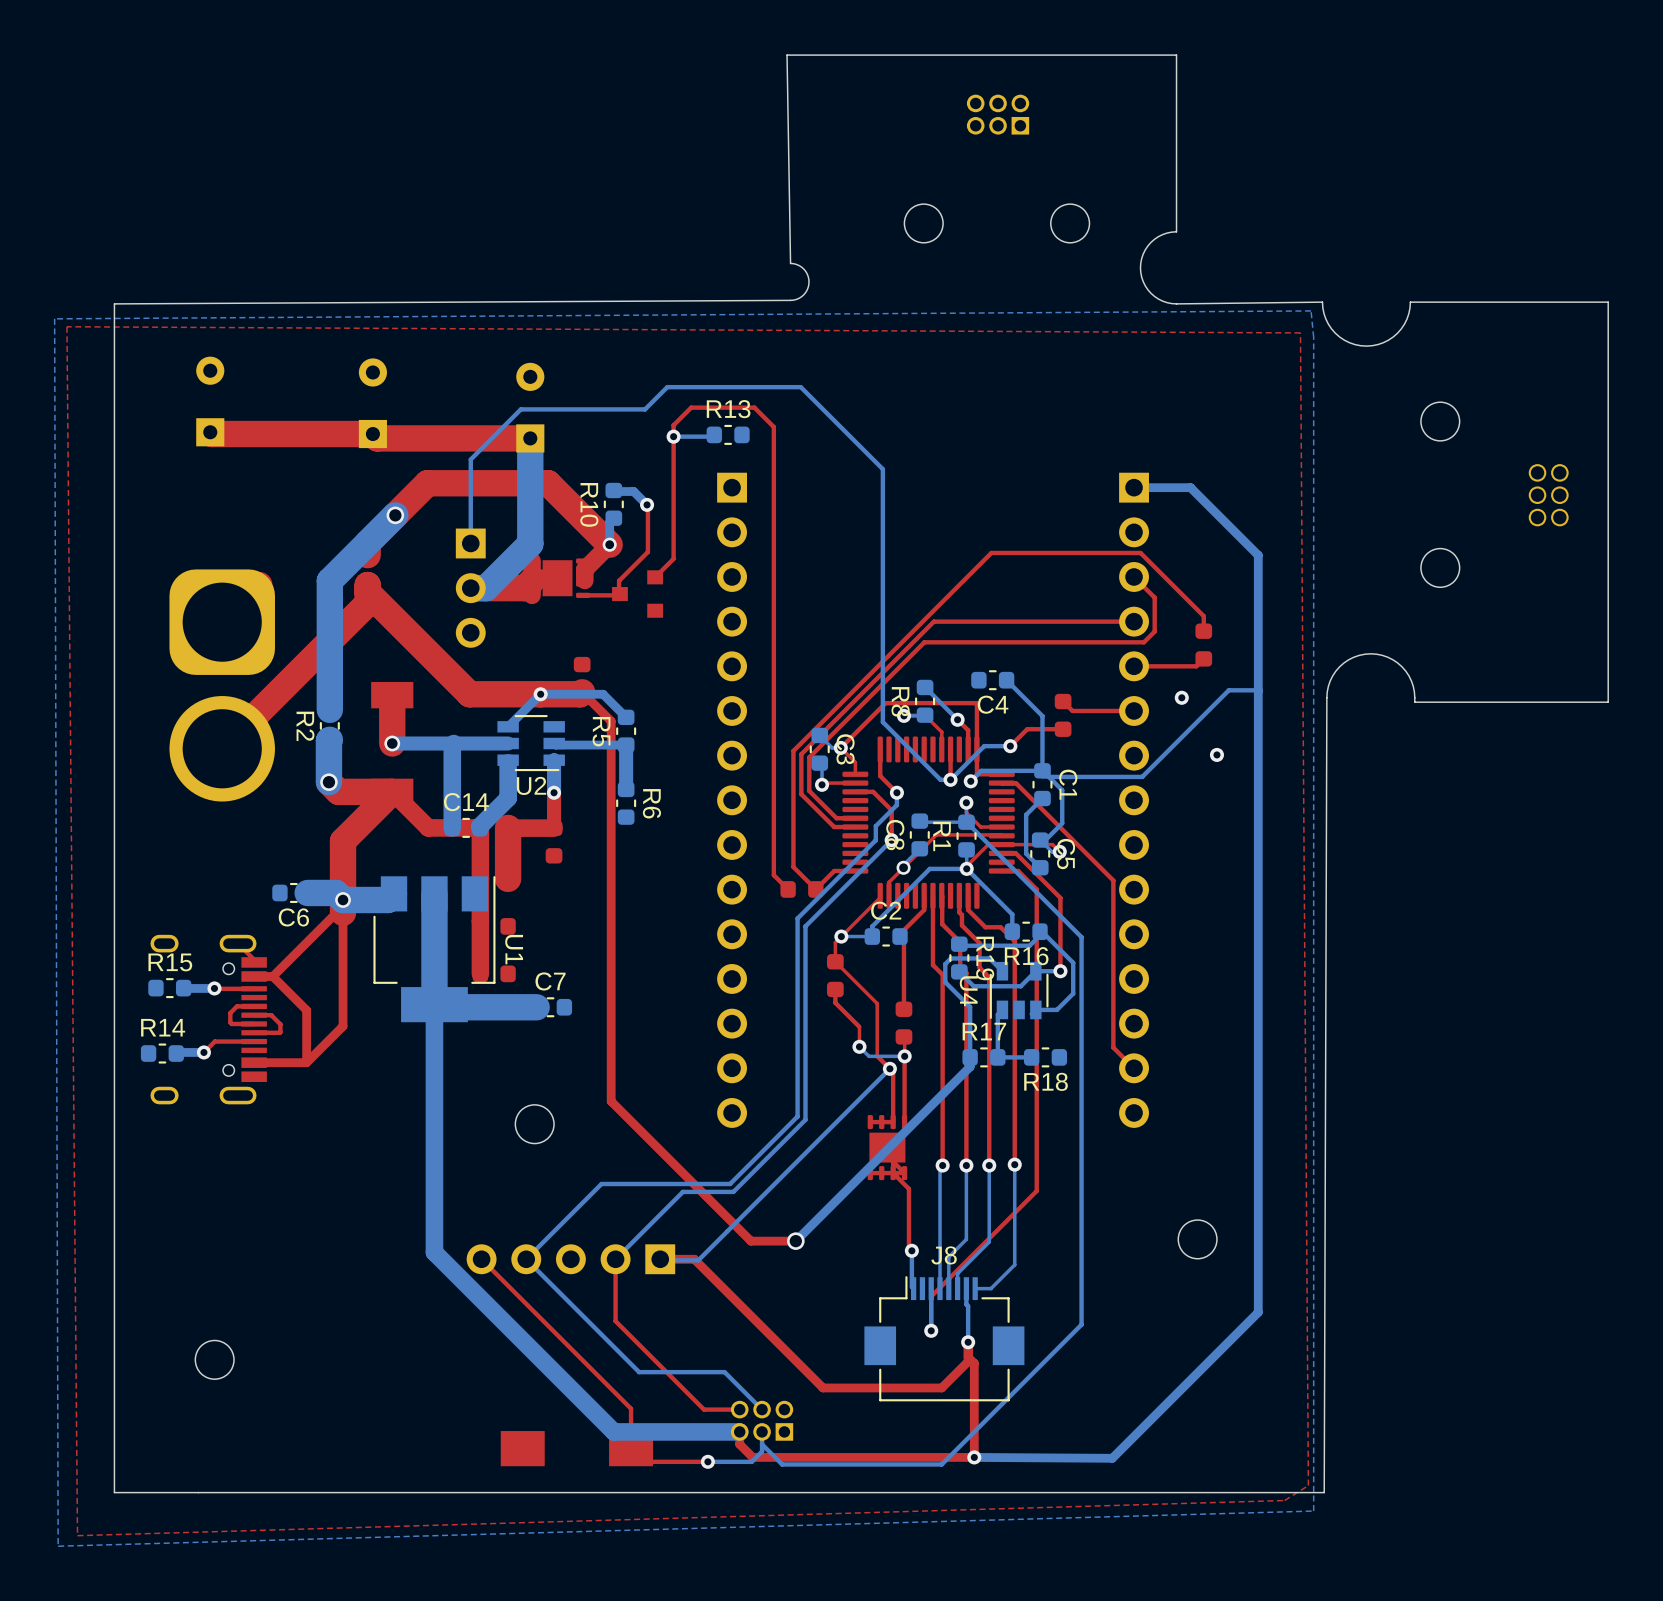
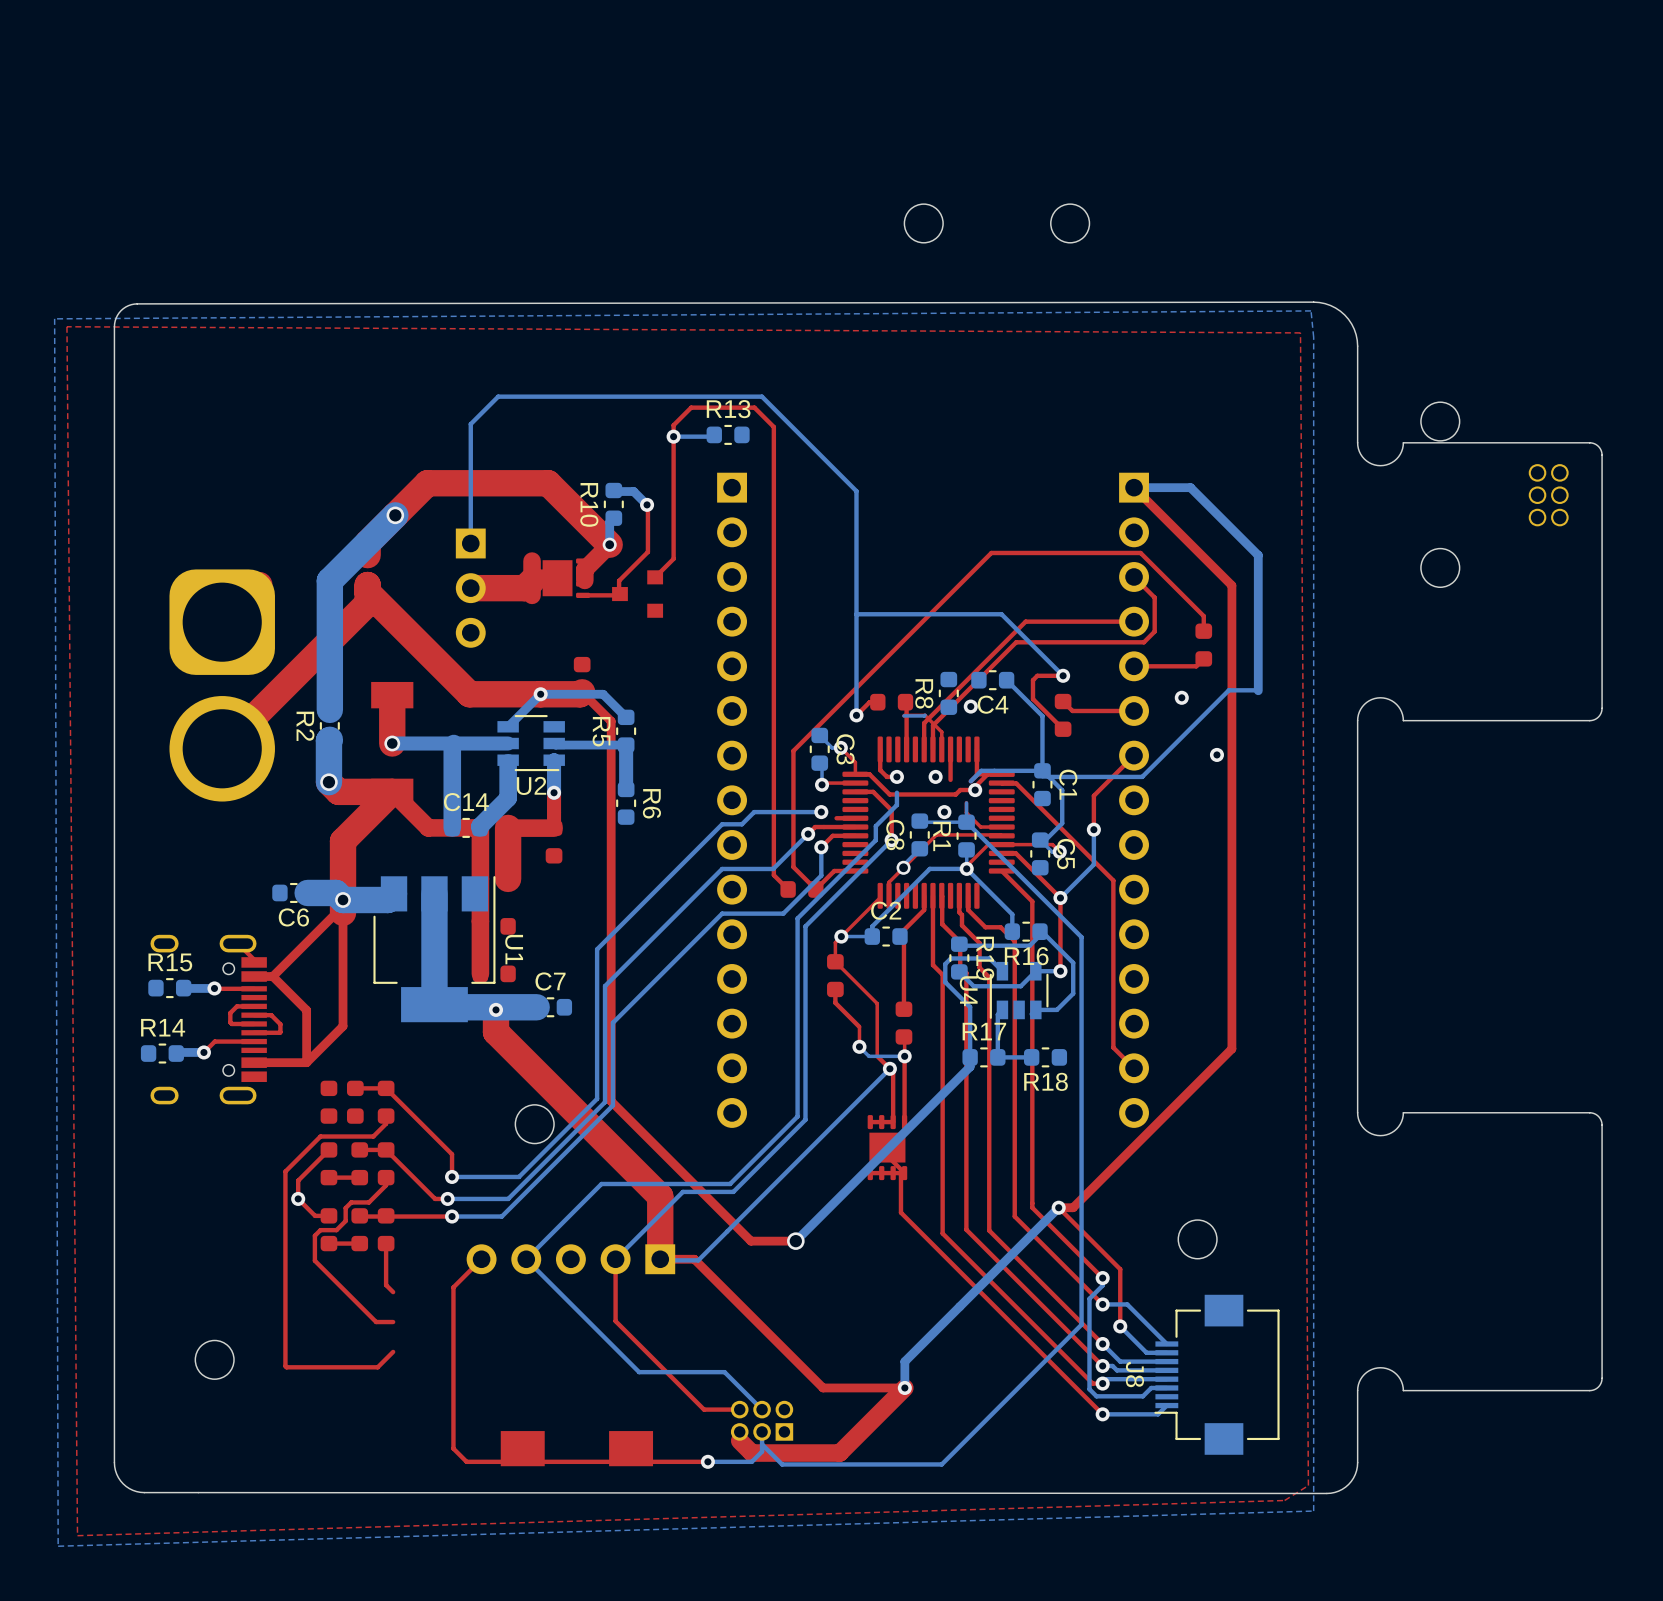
part: (998, 114) -> none
board edge: (114, 326) (114, 303) (797, 298) (805, 293) (809, 281) (803, 268) (790, 263) (787, 55) (1176, 55) (1176, 231) (1162, 234) (1151, 242) (1143, 254) (1140, 267) (1143, 281) (1147, 289) (1158, 299) (1167, 302) (1322, 302) (1325, 318) (1335, 333) (1349, 342) (1366, 346) (1383, 342) (1397, 333) (1407, 318) (1410, 302) (1608, 302) (1608, 702) (1414, 702) (1411, 680) (1401, 666) (1387, 657) (1370, 653) (1354, 657) (1344, 662) (1332, 675) (1328, 686) (1324, 1492) (198, 1492) -> (114, 326) (116, 318) (121, 310) (128, 305) (137, 303) (1319, 302) (1340, 311) (1351, 324) (1356, 334) (1357, 445) (1362, 456) (1369, 462) (1380, 465) (1391, 462) (1400, 454) (1403, 442) (1589, 442) (1597, 445) (1601, 453) (1602, 708) (1598, 717) (1589, 720) (1403, 720) (1401, 711) (1396, 704) (1389, 699) (1380, 697) (1371, 699) (1364, 704) (1359, 711) (1357, 720) (1357, 1112) (1359, 1121) (1366, 1130) (1380, 1135) (1389, 1133) (1396, 1128) (1401, 1121) (1403, 1112) (1589, 1112) (1598, 1116) (1602, 1125) (1602, 1378) (1597, 1388) (1589, 1390) (1403, 1390) (1400, 1379) (1394, 1372) (1383, 1367) (1371, 1369) (1362, 1376) (1357, 1387) (1356, 1470) (1348, 1484) (1342, 1489) (1330, 1493) (198, 1492)
part: (210, 401) -> none
part: (372, 403) -> none
part: (530, 407) -> none
top track: (210, 432) (212, 434) (372, 434) (377, 438) (530, 438) -> none
bottom track: (530, 438) (530, 543) (486, 588) (470, 588) -> none
bottom track: (470, 459) (520, 409) (645, 409) (667, 387) (800, 387) (882, 469) (882, 722) (940, 779) (950, 779) (984, 746) (1010, 746) -> (470, 459) (470, 424) (498, 396) (761, 396) (856, 491) (856, 715)
top track: none -> (1134, 487) (1231, 585) (1231, 1048) (1073, 1207) (1058, 1207) (1120, 1269) (1120, 1326)
bottom track: none -> (856, 614) (1001, 614) (1063, 675)
top track: (1025, 621) (933, 621) (801, 754) (801, 794) (834, 827) -> (1025, 621) (924, 723) (924, 749)
top track: (1016, 642) (924, 642) (809, 757) (809, 790) (836, 818) -> (1016, 642) (932, 725) (932, 749)
via: none -> (1063, 675)
bottom track: (925, 687) (957, 719) -> none
bottom track: (1258, 690) (1258, 1312) (1112, 1458) (974, 1458) -> none
R8 position: (925, 701) -> (948, 693)
top track: none -> (877, 702) (869, 702) (856, 715)
part: none -> (891, 702)
top track: none -> (905, 702) (906, 749)
via: none -> (856, 715)
via: (903, 715) -> none
top track: (957, 719) (968, 730) (968, 749) -> none
via position: (957, 719) -> (970, 706)
top track: (1063, 729) (1027, 729) (1010, 746) -> (1063, 729) (1032, 699) (1032, 680) (1037, 675) (1063, 675)
via: (1010, 746) -> none
top track: (840, 747) (885, 703) (976, 703) (976, 749) -> none
top track: none -> (1134, 755) (1093, 795) (1093, 829)
top track: (880, 770) (880, 776) (896, 792) -> (880, 770) (886, 776) (896, 776)
top track: none -> (855, 774) (869, 774) (889, 794) (955, 794) (960, 790) (972, 790)
top track: none -> (987, 774) (975, 786) (975, 790) (972, 790)
via: none -> (935, 776)
via: (950, 779) -> none
via: (970, 781) -> none
via: none -> (975, 790)
via position: (896, 792) -> (896, 776)
bottom track: (1042, 798) (1026, 814) (1026, 853) (1040, 867) -> none
via: (966, 802) -> none
bottom track: none -> (821, 812) (754, 812) (741, 824) (722, 824) (597, 949) (597, 1098) (519, 1176) (447, 1176)
via: none -> (821, 812)
via: none -> (944, 812)
top track: none -> (834, 827) (815, 827) (808, 834)
bottom track: none -> (1093, 829) (1093, 864) (1060, 897)
via: none -> (1093, 829)
bottom track: none -> (808, 834) (773, 868) (722, 868) (605, 986) (605, 1102) (508, 1198) (447, 1198)
via: none -> (808, 834)
top track: none -> (855, 835) (832, 835) (821, 847)
bottom track: none -> (821, 847) (821, 875) (783, 913) (722, 913) (612, 1022) (612, 1105) (501, 1216) (452, 1216)
via: none -> (821, 847)
top track: (1001, 870) (1018, 870) (1036, 889) (1036, 1191) (931, 1296) (931, 1330) -> (1001, 870) (1032, 901) (1032, 1207) (1102, 1278)
via: none -> (1060, 897)
bottom track: (434, 1004) (434, 1252) (613, 1431) (739, 1431) -> none
top track: none -> (496, 1009) (496, 1032) (660, 1196) (660, 1259)
via: none -> (496, 1009)
top track: none -> (355, 1088) (386, 1088) (452, 1154) (452, 1176)
part: none -> (328, 1102)
part: none -> (355, 1102)
part: none -> (386, 1102)
top track: none -> (386, 1116) (386, 1123) (373, 1136) (320, 1136) (285, 1171) (285, 1366) (377, 1367) (393, 1351)
top track: none -> (328, 1149) (298, 1180) (298, 1198) (315, 1215) (328, 1215)
top track: none -> (359, 1149) (386, 1149) (435, 1198) (447, 1198)
top track: (893, 1153) (893, 1173) (908, 1188) (908, 1247) (911, 1250) -> none
part: none -> (328, 1163)
part: none -> (359, 1163)
part: none -> (386, 1163)
bottom track: (1014, 1164) (1014, 1264) (991, 1288) (975, 1288) -> none
top track: none -> (1014, 1164) (1014, 1216) (1102, 1304)
via: (1014, 1164) -> none
bottom track: (942, 1165) (940, 1168) (940, 1288) -> none
top track: none -> (942, 1165) (942, 1233) (1092, 1383) (1102, 1383)
via: (942, 1165) -> none
bottom track: (966, 1165) (966, 1239) (948, 1256) (948, 1288) -> none
top track: none -> (966, 1165) (966, 1229) (1102, 1365)
via: (966, 1165) -> none
bottom track: (989, 1165) (989, 1242) (957, 1273) (957, 1288) -> none
top track: none -> (989, 1165) (989, 1230) (1102, 1344)
via: (989, 1165) -> none
top track: none -> (900, 1173) (900, 1212) (1102, 1414)
via: none -> (452, 1176)
top track: none -> (359, 1177) (328, 1177)
top track: none -> (386, 1177) (386, 1185) (368, 1202) (351, 1202) (345, 1208) (345, 1221) (336, 1230) (320, 1230) (314, 1235) (314, 1260) (376, 1322) (393, 1322)
via: none -> (298, 1198)
via: none -> (447, 1198)
bottom track: none -> (1058, 1207) (904, 1361) (904, 1387)
via: none -> (1058, 1207)
top track: none -> (359, 1215) (452, 1216)
via: none -> (452, 1216)
part: none -> (328, 1229)
part: none -> (359, 1229)
part: none -> (386, 1229)
top track: none -> (359, 1243) (328, 1243)
top track: none -> (386, 1243) (386, 1285) (393, 1292)
bottom track: (911, 1250) (911, 1286) (913, 1288) -> none
via: (911, 1250) -> none
top track: (481, 1259) (631, 1408) (631, 1448) (644, 1461) -> (481, 1259) (453, 1287) (453, 1448) (466, 1461) (644, 1461)
bottom track: none -> (1102, 1278) (1102, 1285) (1089, 1298) (1089, 1389) (1096, 1396) (1142, 1396) (1151, 1387) (1166, 1387)
via: none -> (1102, 1278)
bottom track: (931, 1288) (931, 1330) -> none
bottom track: (966, 1288) (968, 1342) -> none
bottom track: none -> (1102, 1304) (1127, 1304) (1166, 1344)
via: none -> (1102, 1304)
bottom track: none -> (1120, 1326) (1146, 1352) (1166, 1352)
via: none -> (1120, 1326)
via: (931, 1330) -> none
J8 rotation: 0° (944, 1338) -> 90° counterclockwise (1216, 1374)
J8 position: (944, 1338) -> (1216, 1374)
top track: (968, 1342) (968, 1361) (941, 1387) (904, 1387) -> none
via: (968, 1342) -> none
bottom track: none -> (1102, 1344) (1120, 1361) (1166, 1361)
via: none -> (1102, 1344)
top track: (968, 1357) (974, 1363) (974, 1457) (752, 1457) (739, 1444) (739, 1440) -> (904, 1387) (839, 1453) (751, 1453) (739, 1440)
bottom track: none -> (1102, 1365) (1112, 1365) (1117, 1370) (1166, 1370)
via: none -> (1102, 1365)
bottom track: none -> (1166, 1379) (1107, 1379) (1102, 1383)
via: none -> (1102, 1383)
via: none -> (904, 1387)
bottom track: none -> (1166, 1405) (1158, 1414) (1102, 1414)
via: none -> (1102, 1414)
via: (974, 1457) -> none
board edge: (114, 1462) (114, 1492) (144, 1492) -> (114, 1462) (116, 1474) (123, 1483) (132, 1490) (144, 1492)

